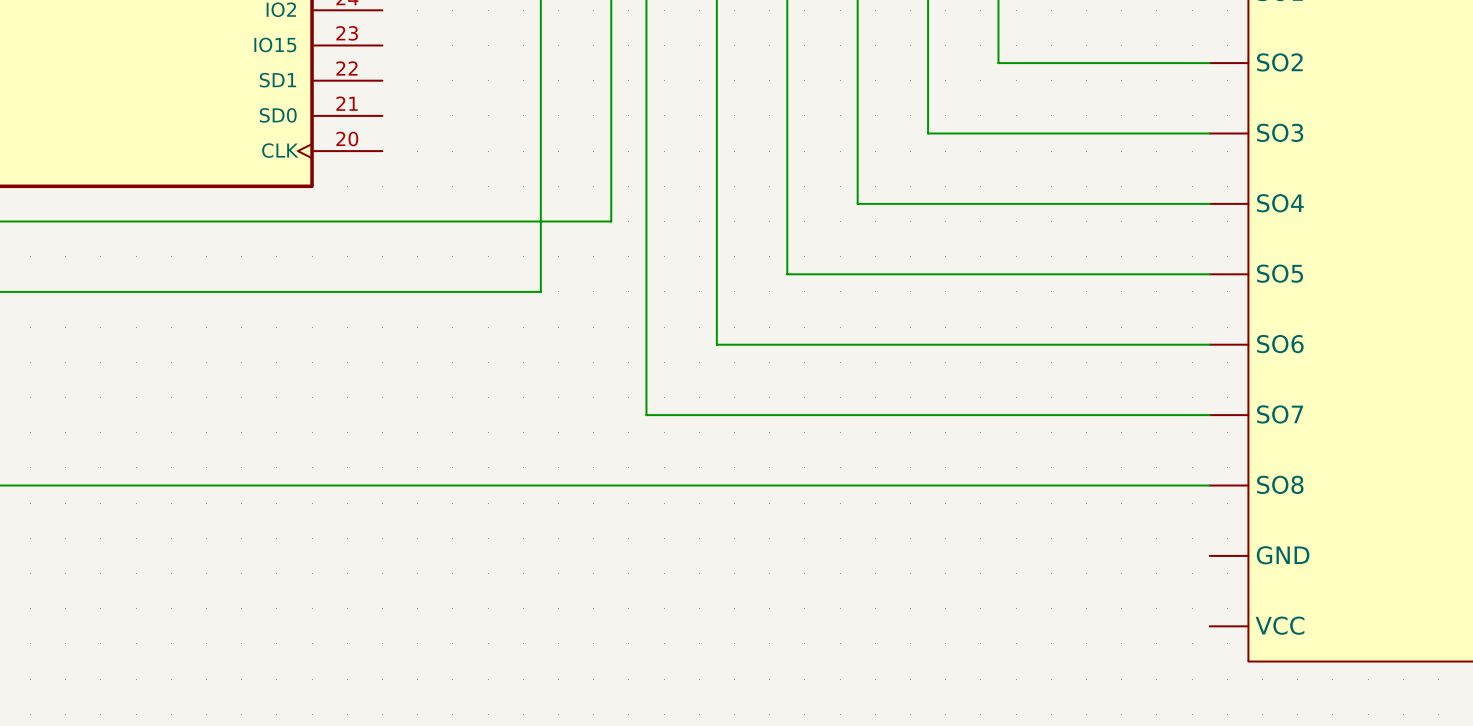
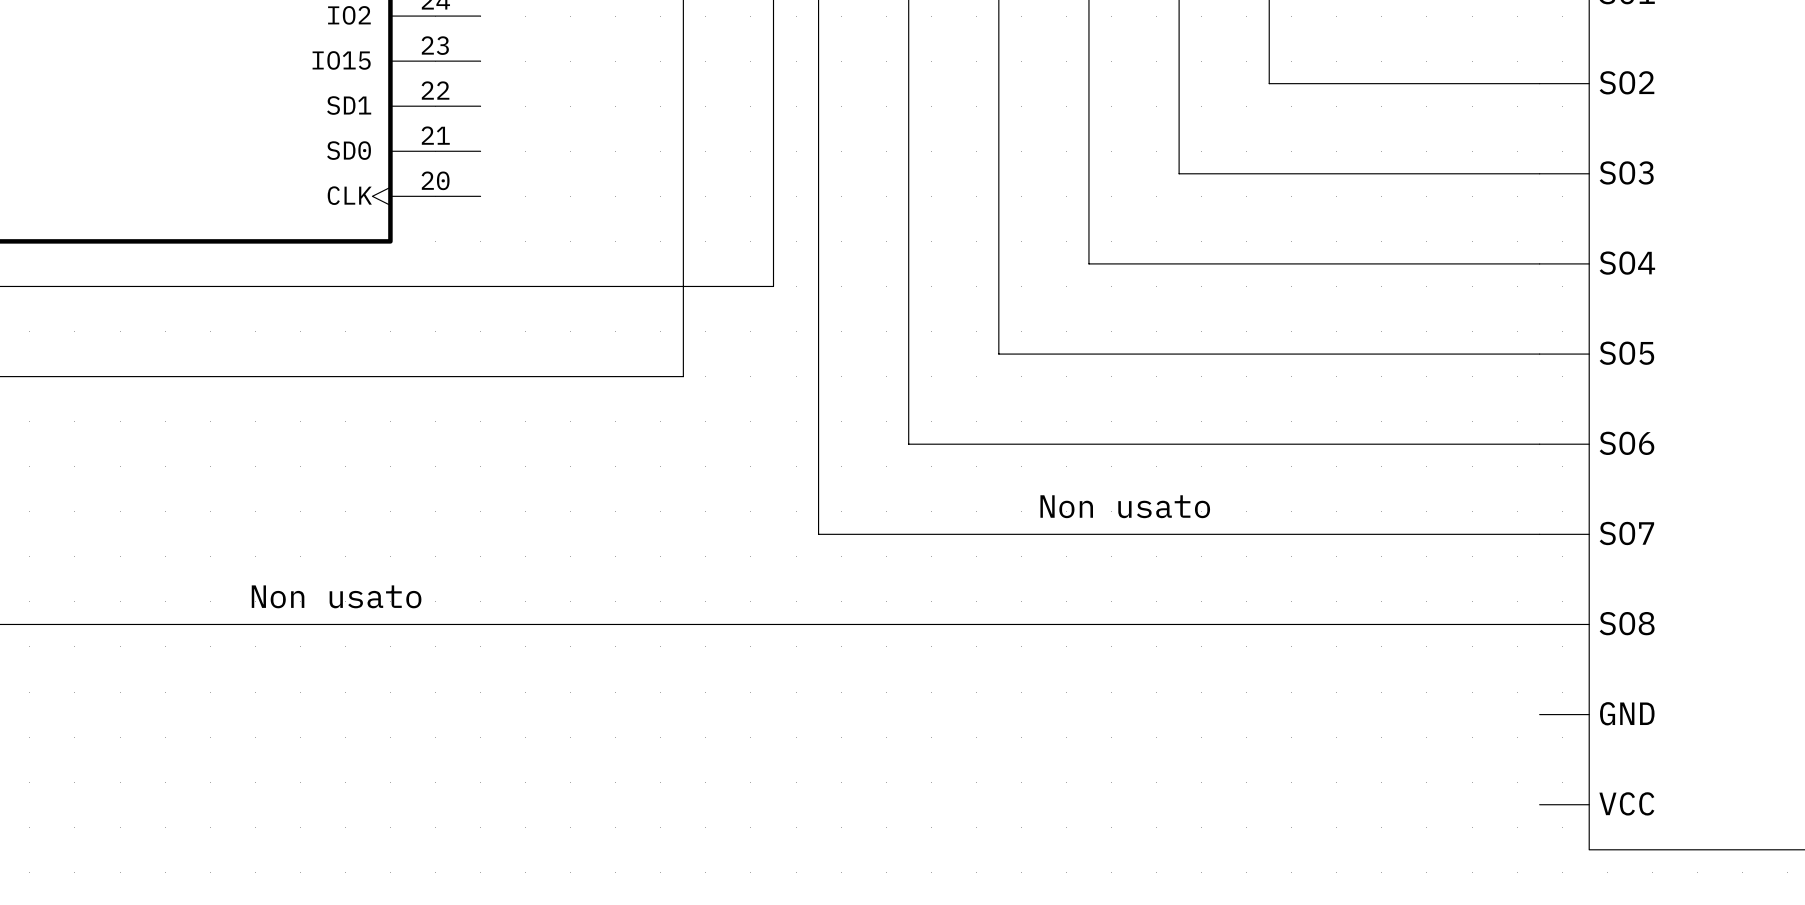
text: none -> Non usato (1125, 506)
text: none -> Non usato (336, 596)

